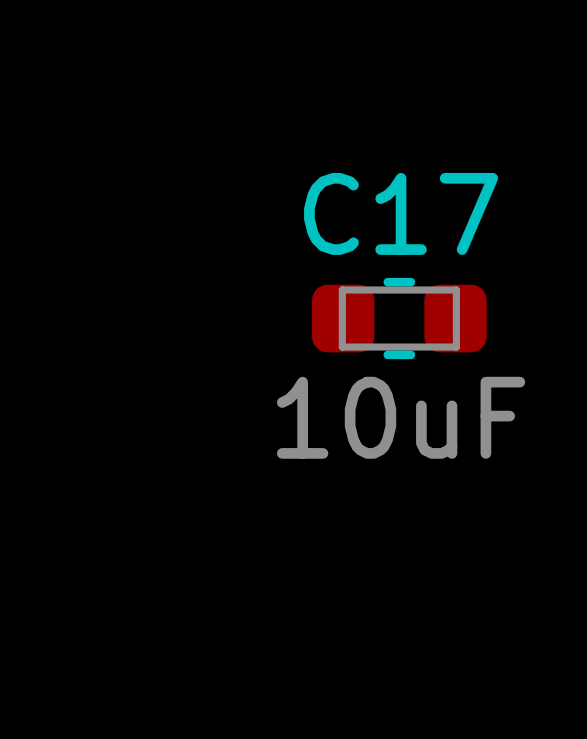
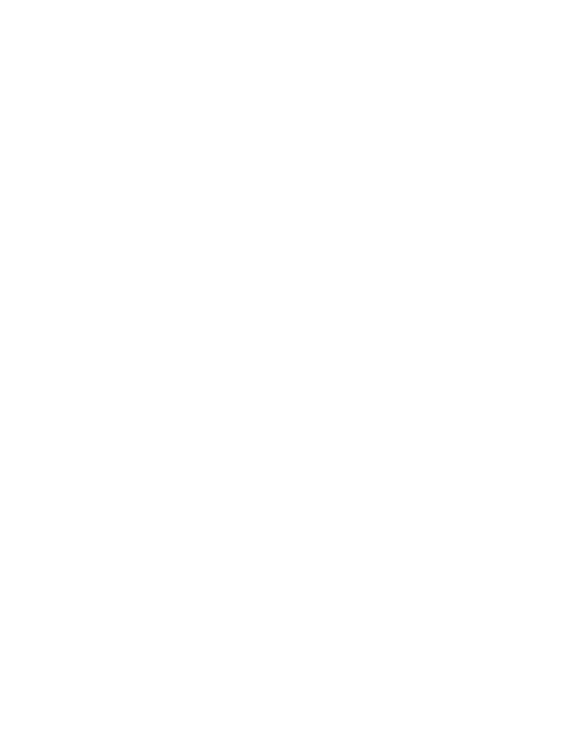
C17: 10uF (399, 318) -> none

